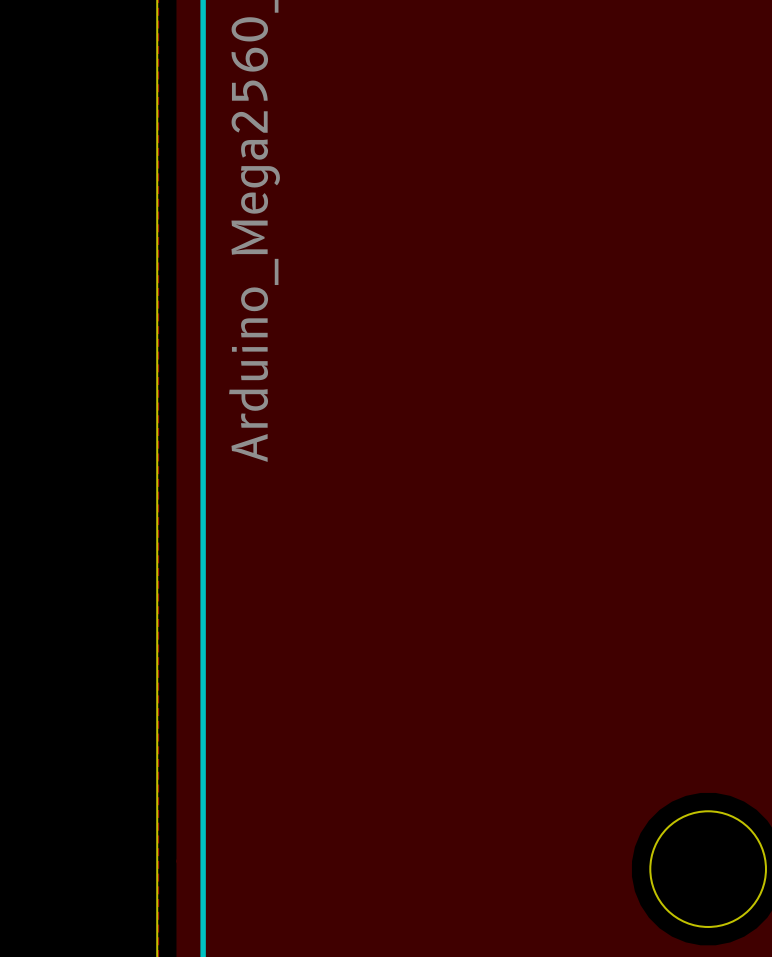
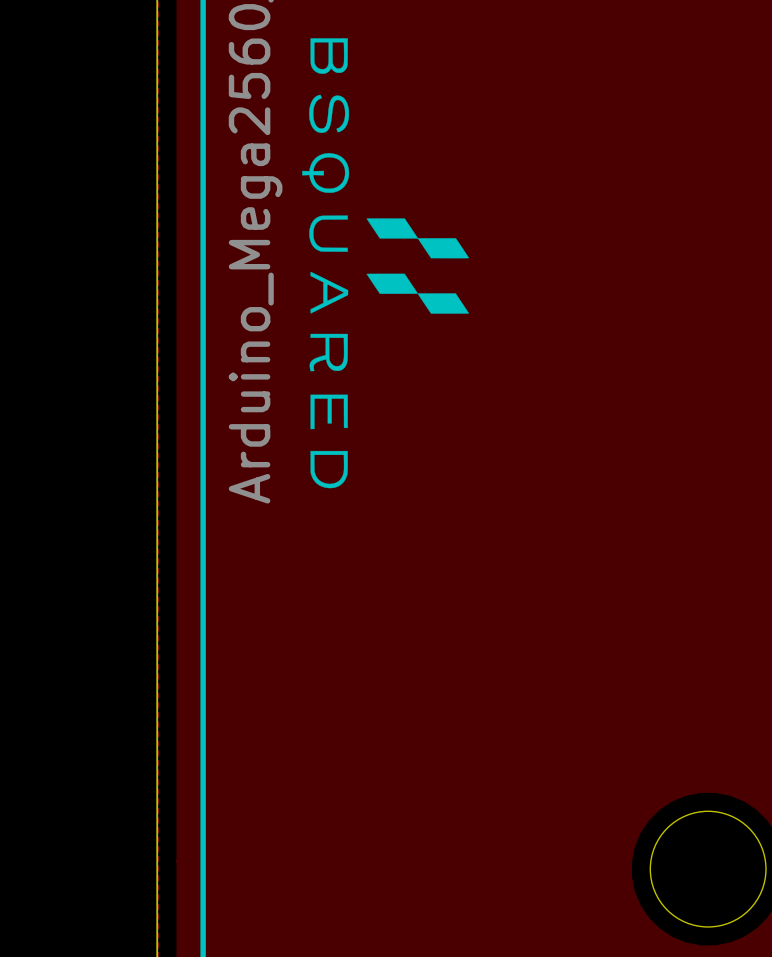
drawing: none -> [302, 38, 470, 489]

